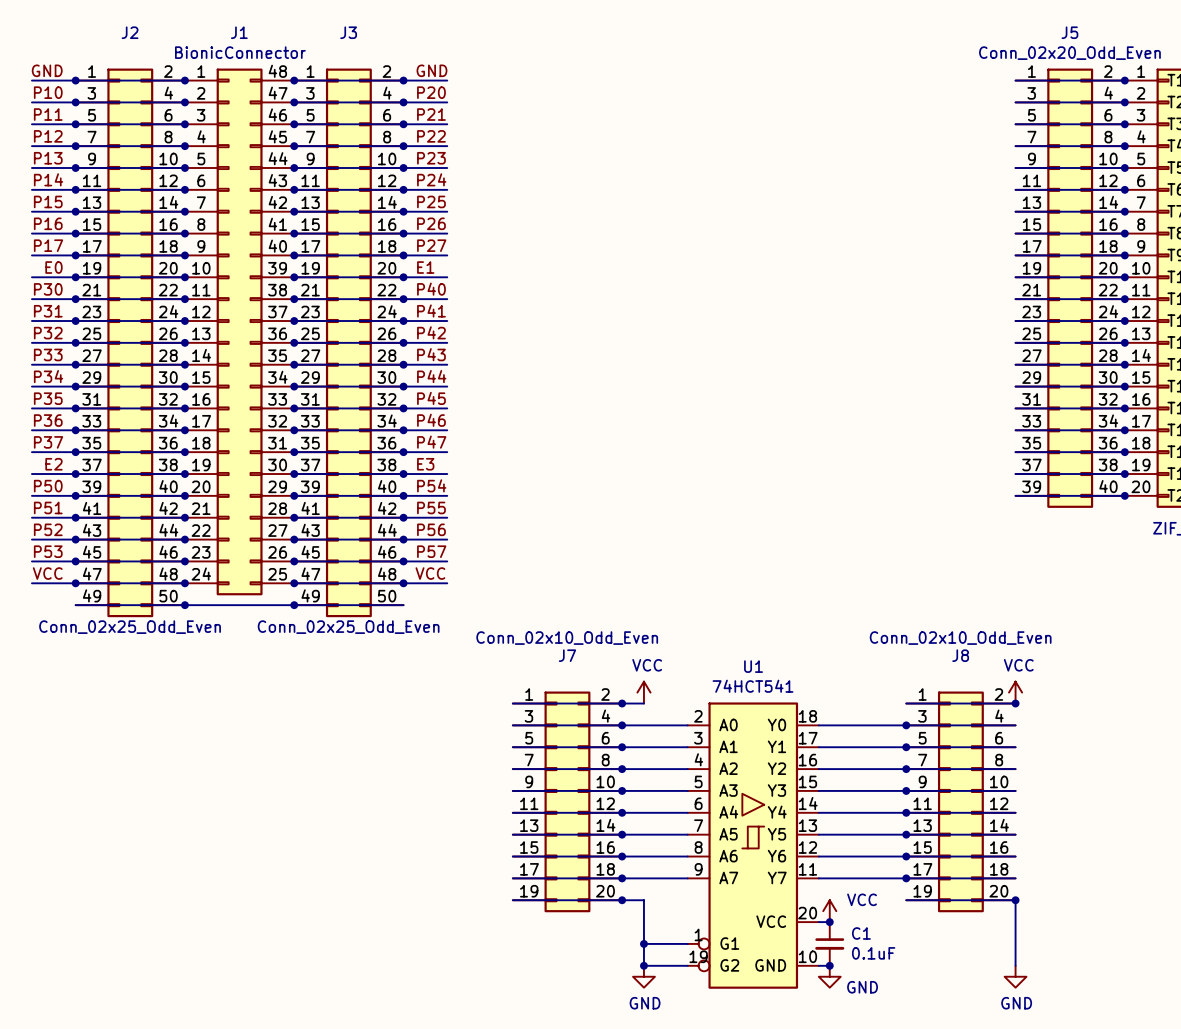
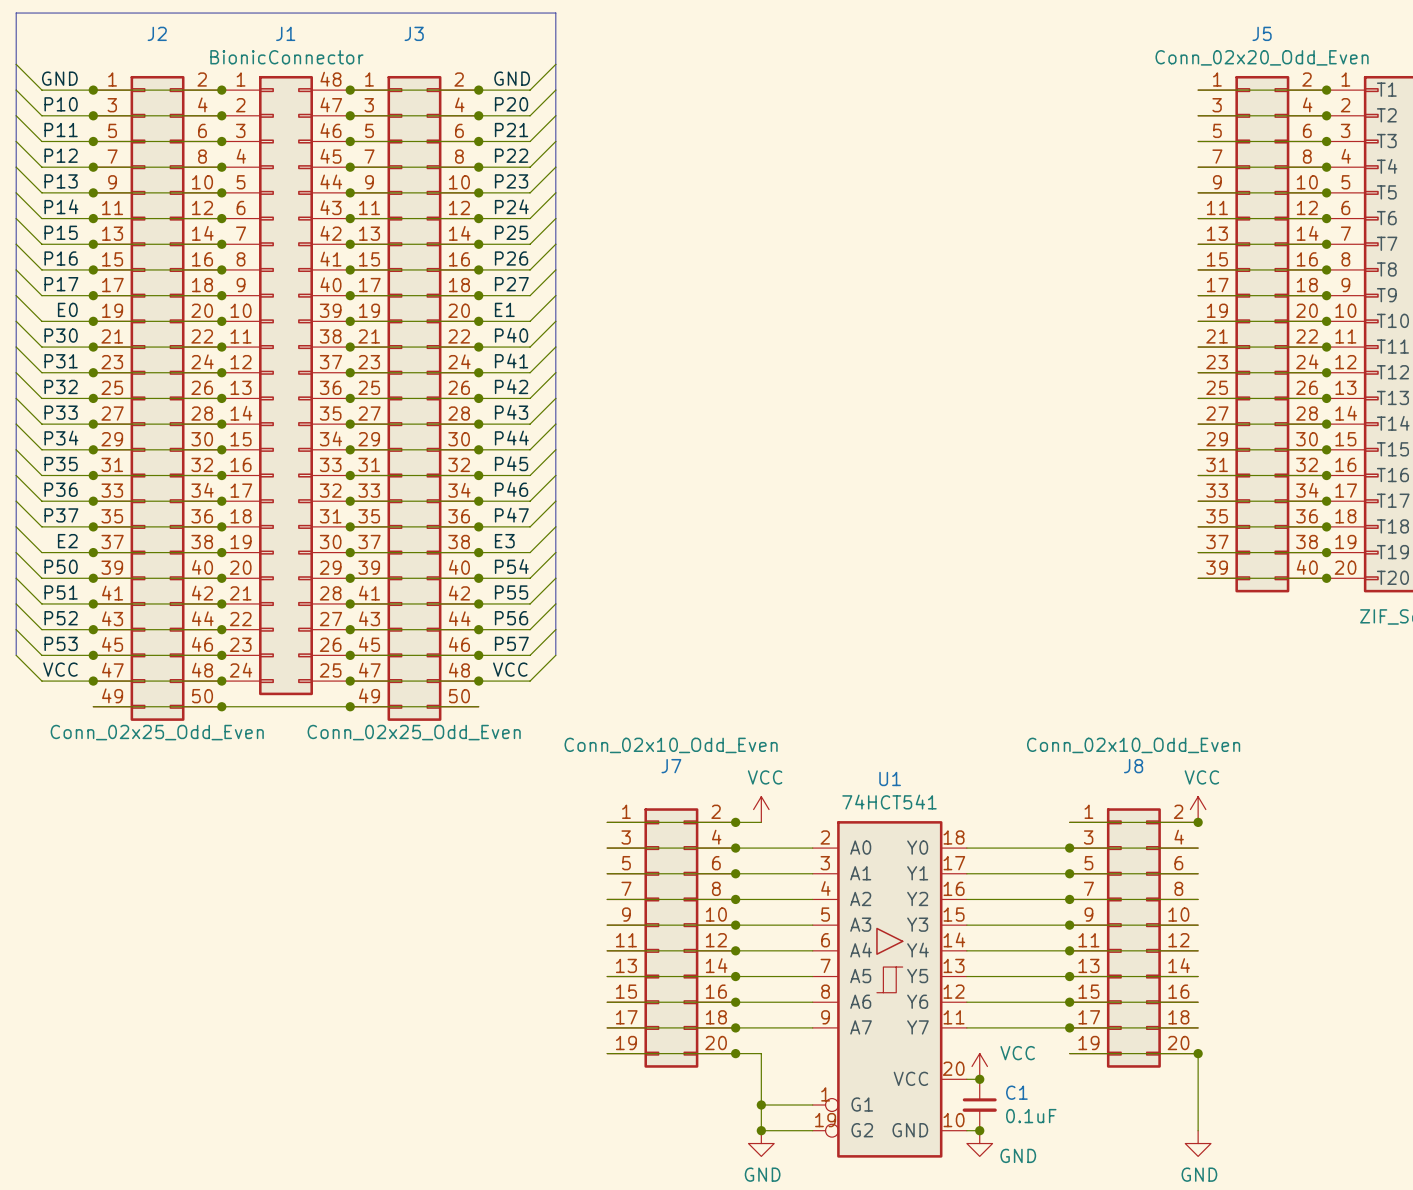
wire: none -> (16, 64) (41, 90)
wire: none -> (555, 64) (530, 90)
wire: none -> (16, 90) (41, 115)
wire: none -> (555, 90) (530, 115)
wire: none -> (16, 115) (41, 141)
wire: none -> (555, 115) (530, 141)
wire: none -> (16, 141) (41, 167)
wire: none -> (555, 141) (530, 167)
wire: none -> (16, 167) (41, 192)
wire: none -> (555, 167) (530, 192)
wire: none -> (16, 192) (41, 218)
wire: none -> (555, 192) (530, 218)
wire: none -> (16, 218) (41, 244)
wire: none -> (555, 218) (530, 244)
wire: none -> (16, 244) (41, 269)
wire: none -> (555, 244) (530, 269)
wire: none -> (16, 269) (41, 295)
wire: none -> (555, 269) (530, 295)
wire: none -> (16, 295) (41, 321)
wire: none -> (555, 295) (530, 321)
wire: none -> (16, 321) (41, 347)
wire: none -> (555, 321) (530, 347)
wire: none -> (16, 347) (41, 372)
wire: none -> (555, 347) (530, 372)
wire: none -> (16, 372) (41, 398)
wire: none -> (555, 372) (530, 398)
wire: none -> (16, 398) (41, 424)
wire: none -> (555, 398) (530, 424)
wire: none -> (16, 424) (41, 449)
wire: none -> (555, 424) (530, 449)
wire: none -> (16, 449) (41, 475)
wire: none -> (555, 449) (530, 475)
wire: none -> (16, 475) (41, 501)
wire: none -> (555, 475) (530, 501)
wire: none -> (16, 501) (41, 526)
wire: none -> (555, 501) (530, 526)
wire: none -> (16, 526) (41, 552)
wire: none -> (555, 526) (530, 552)
wire: none -> (16, 552) (41, 578)
wire: none -> (555, 552) (530, 578)
wire: none -> (16, 578) (41, 603)
wire: none -> (555, 578) (530, 603)
wire: none -> (16, 603) (41, 629)
wire: none -> (555, 603) (530, 629)
wire: none -> (16, 629) (41, 655)
wire: none -> (555, 629) (530, 655)
wire: none -> (16, 655) (41, 681)
bus: none -> (16, 655) (16, 13) (555, 13) (555, 655)
wire: none -> (555, 655) (530, 681)

